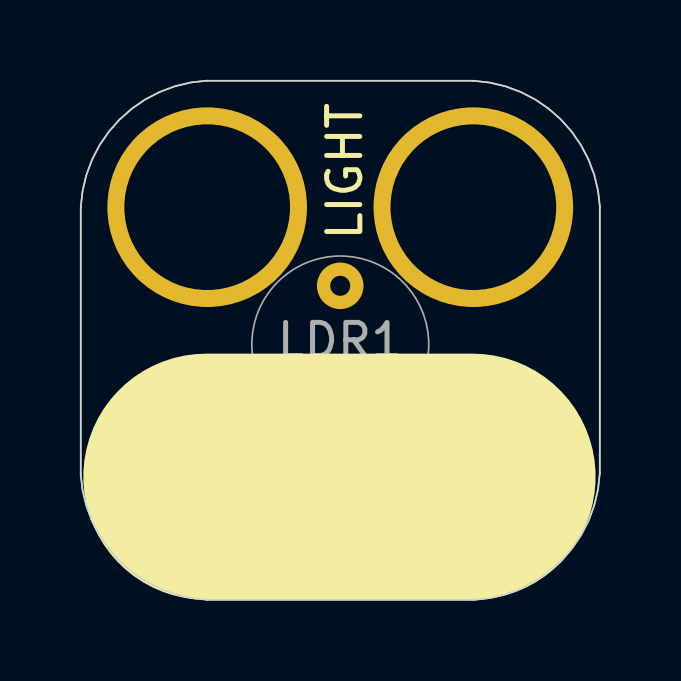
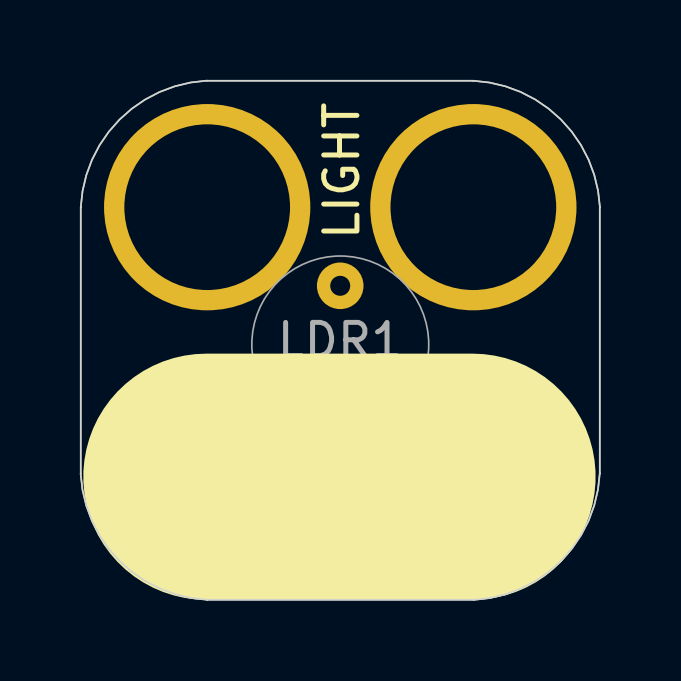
LDR1 footprint: [79, 79, 601, 601] -> [79, 79, 601, 601]

